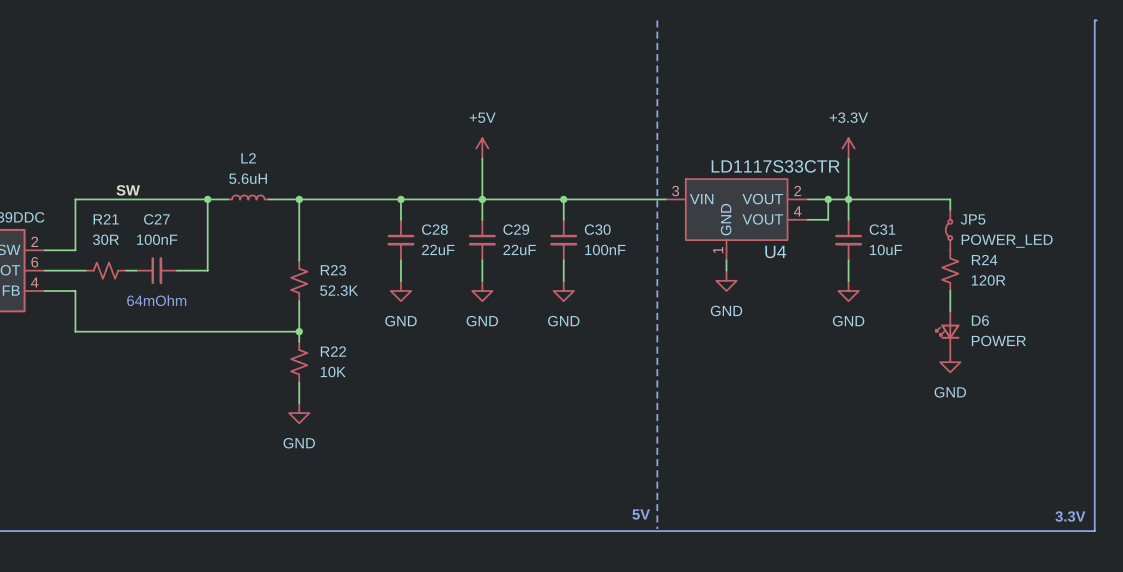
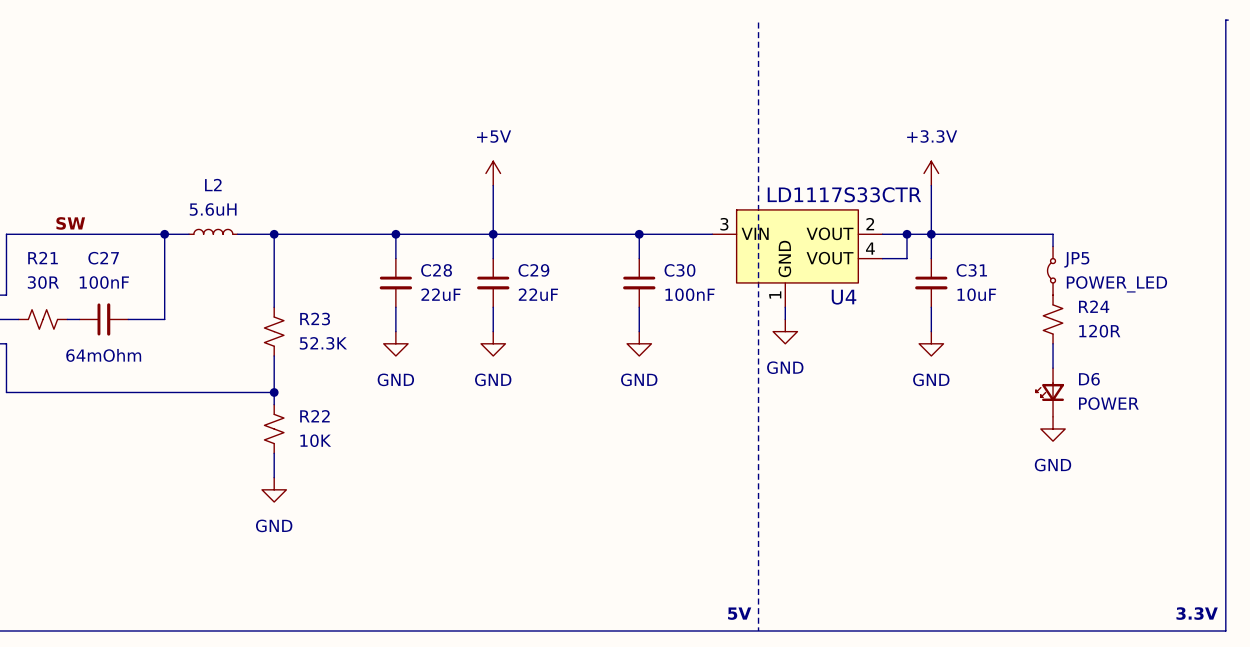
line: (657, 20) (657, 529) -> (758, 22) (758, 630)
wire: (563, 199) (563, 219) -> (639, 234) (639, 258)
junction position: (563, 199) -> (639, 234)
C30 position: (563, 240) -> (639, 282)
wire: (563, 260) (563, 280) -> (639, 307) (639, 331)
power symbol position: GND (563, 290) -> GND (639, 343)
text position: 5V (641, 514) -> 5V (739, 613)

